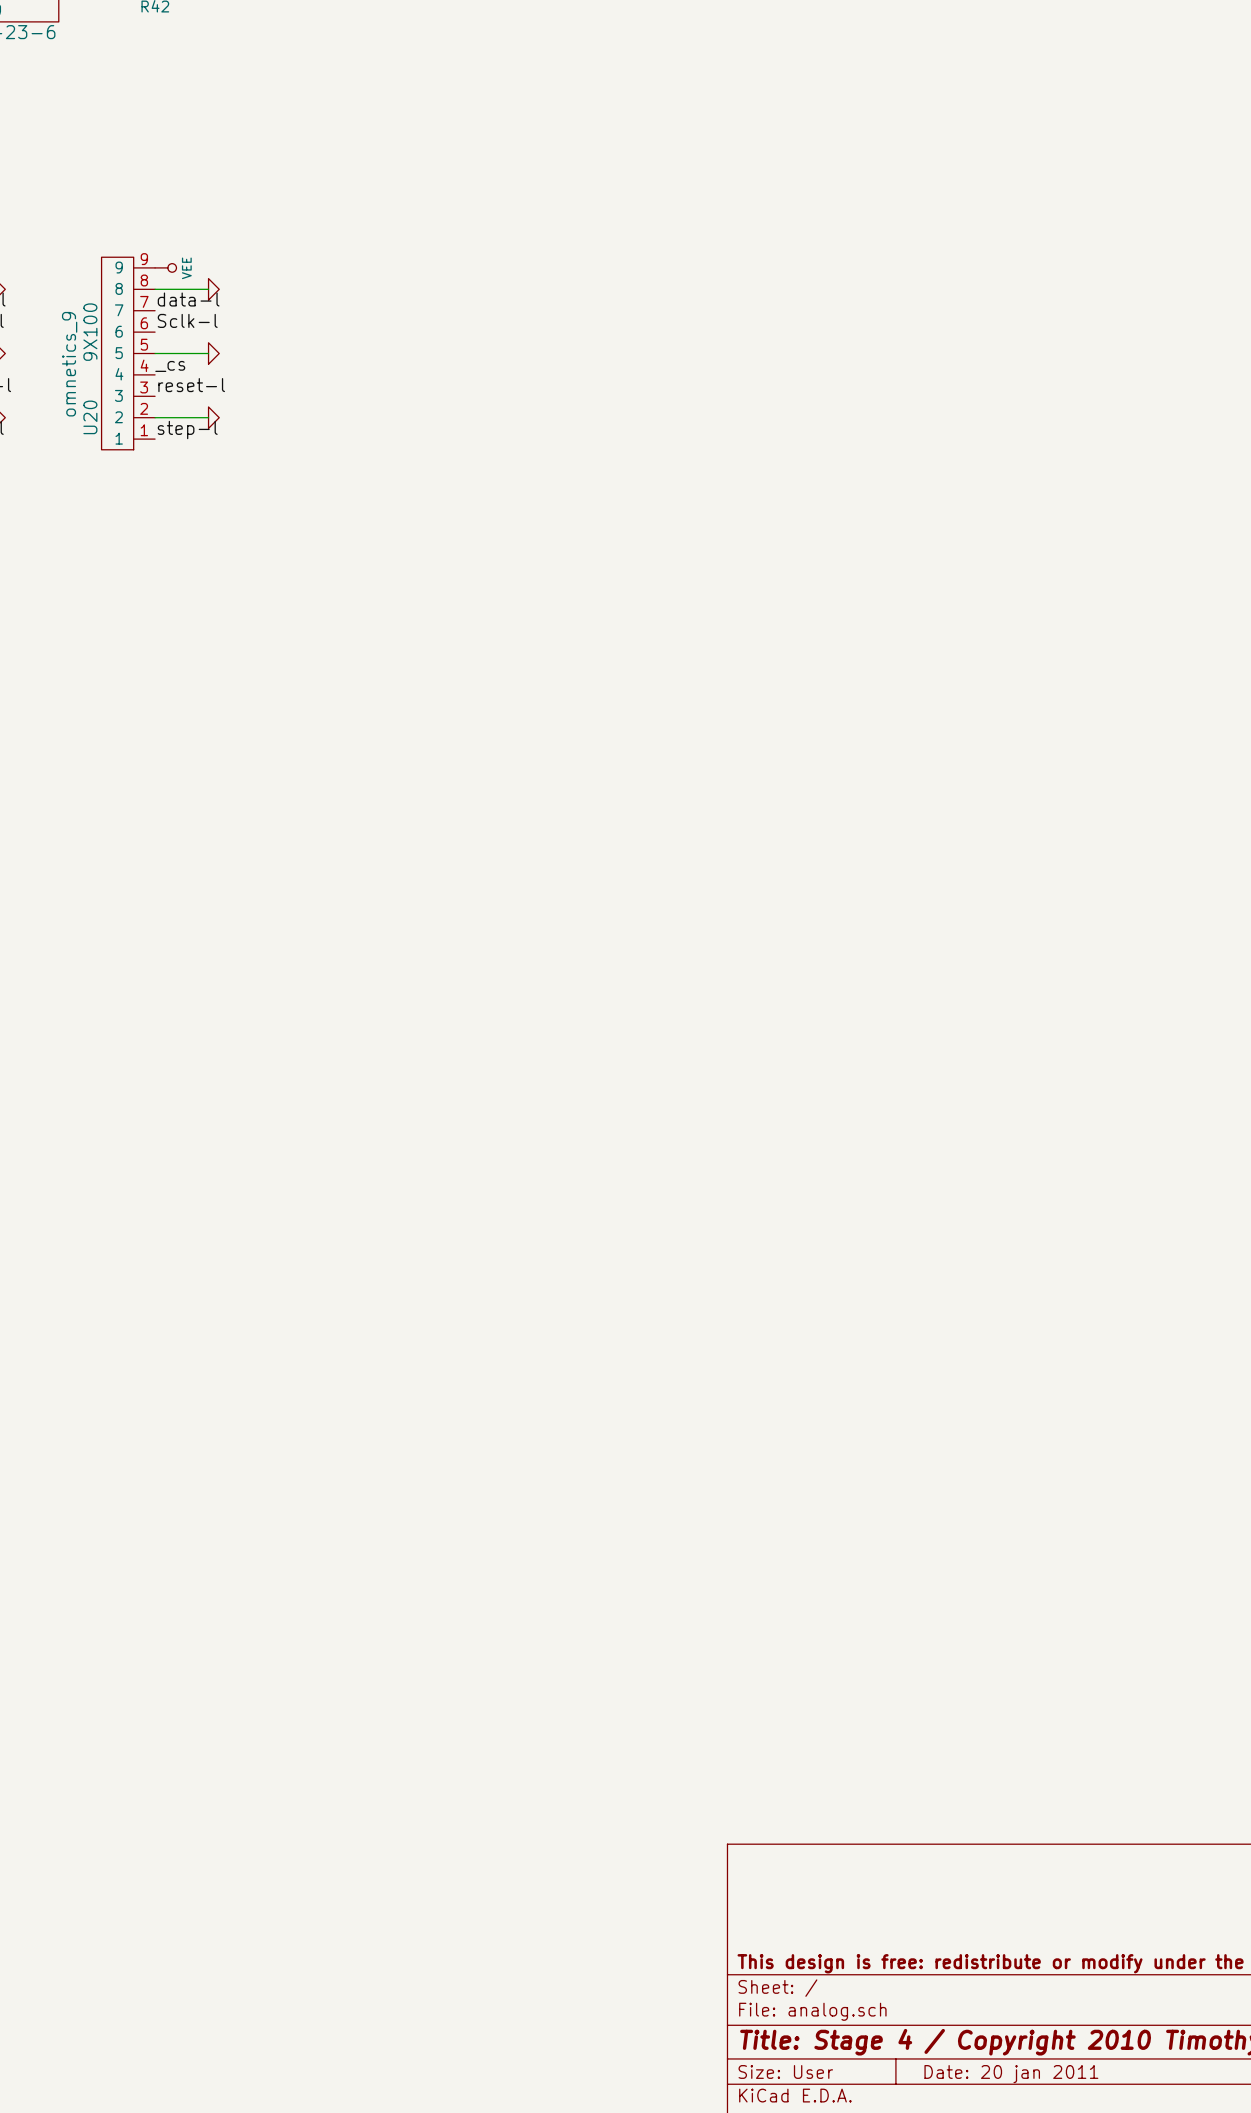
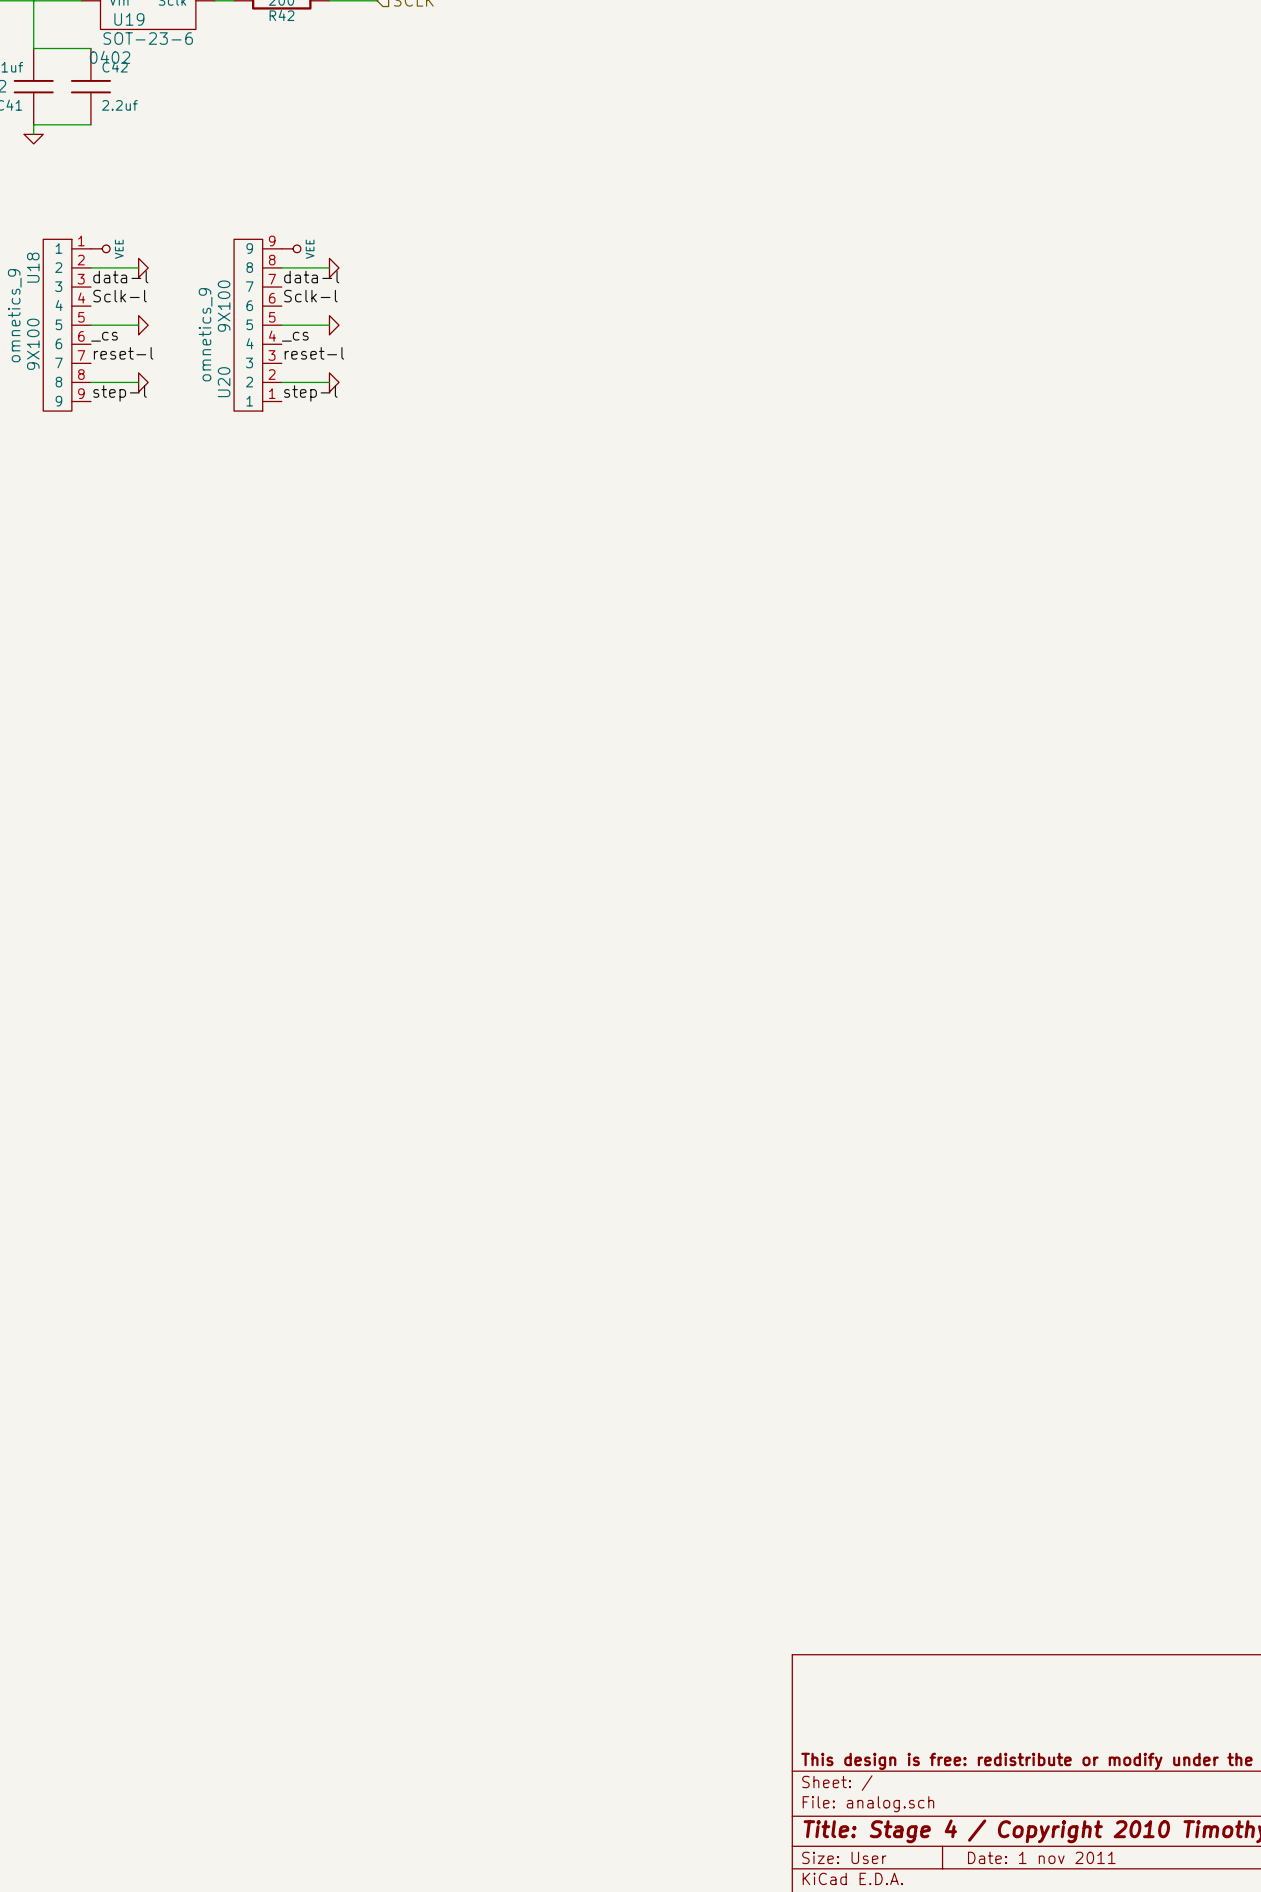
title block: Date: 20 jan 2011 (1011, 2074) -> Date: 1 nov 2011 (1041, 1857)

